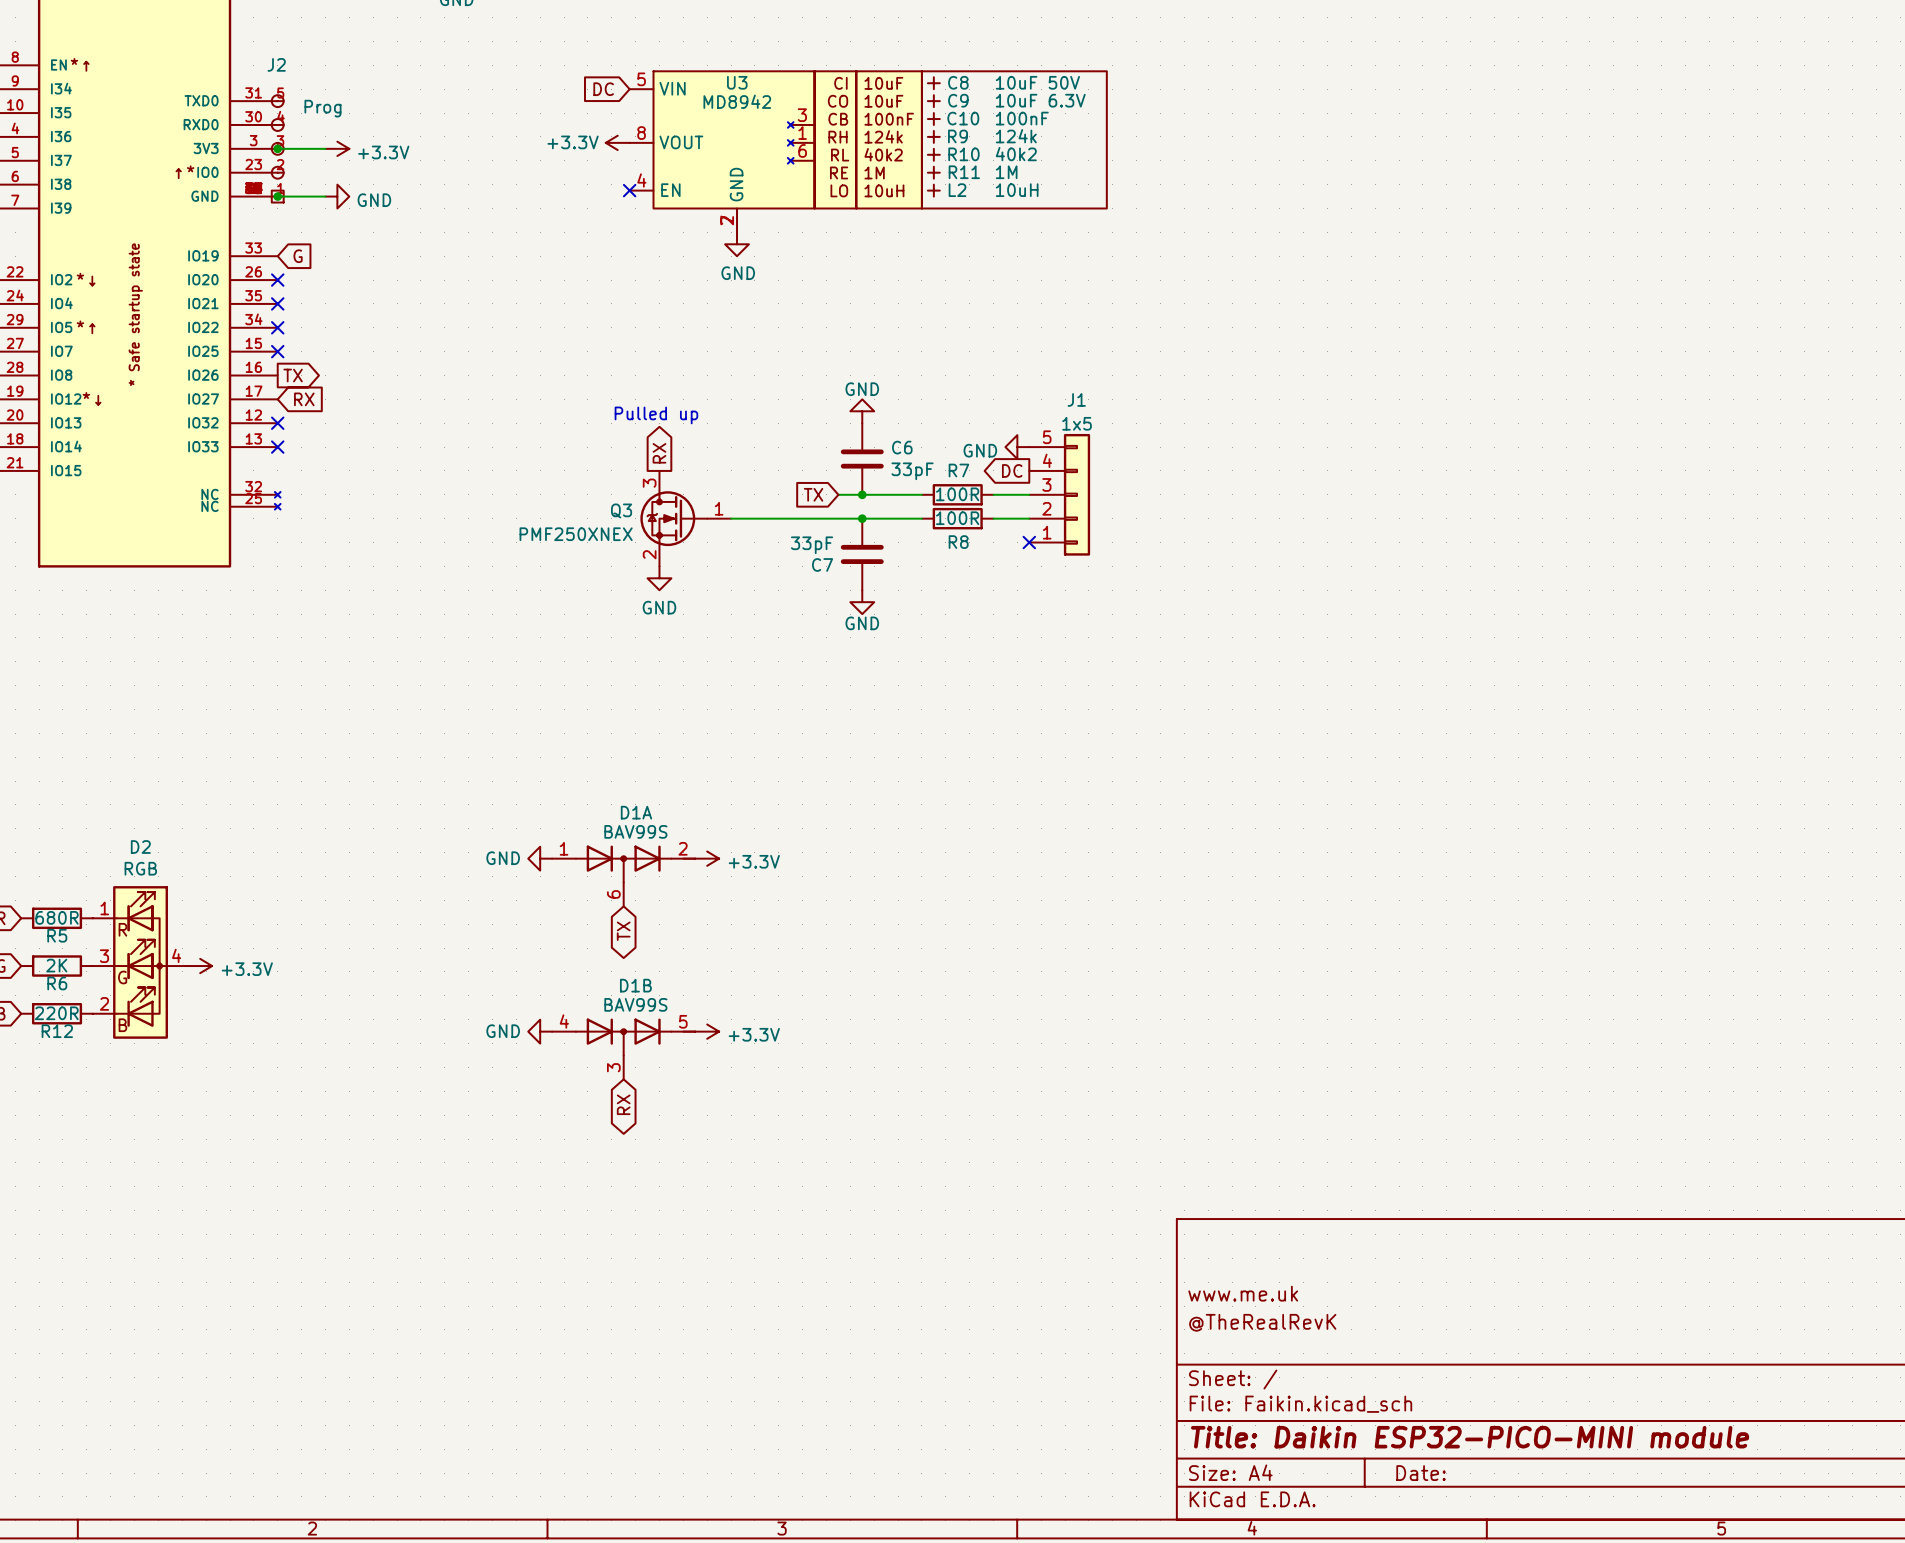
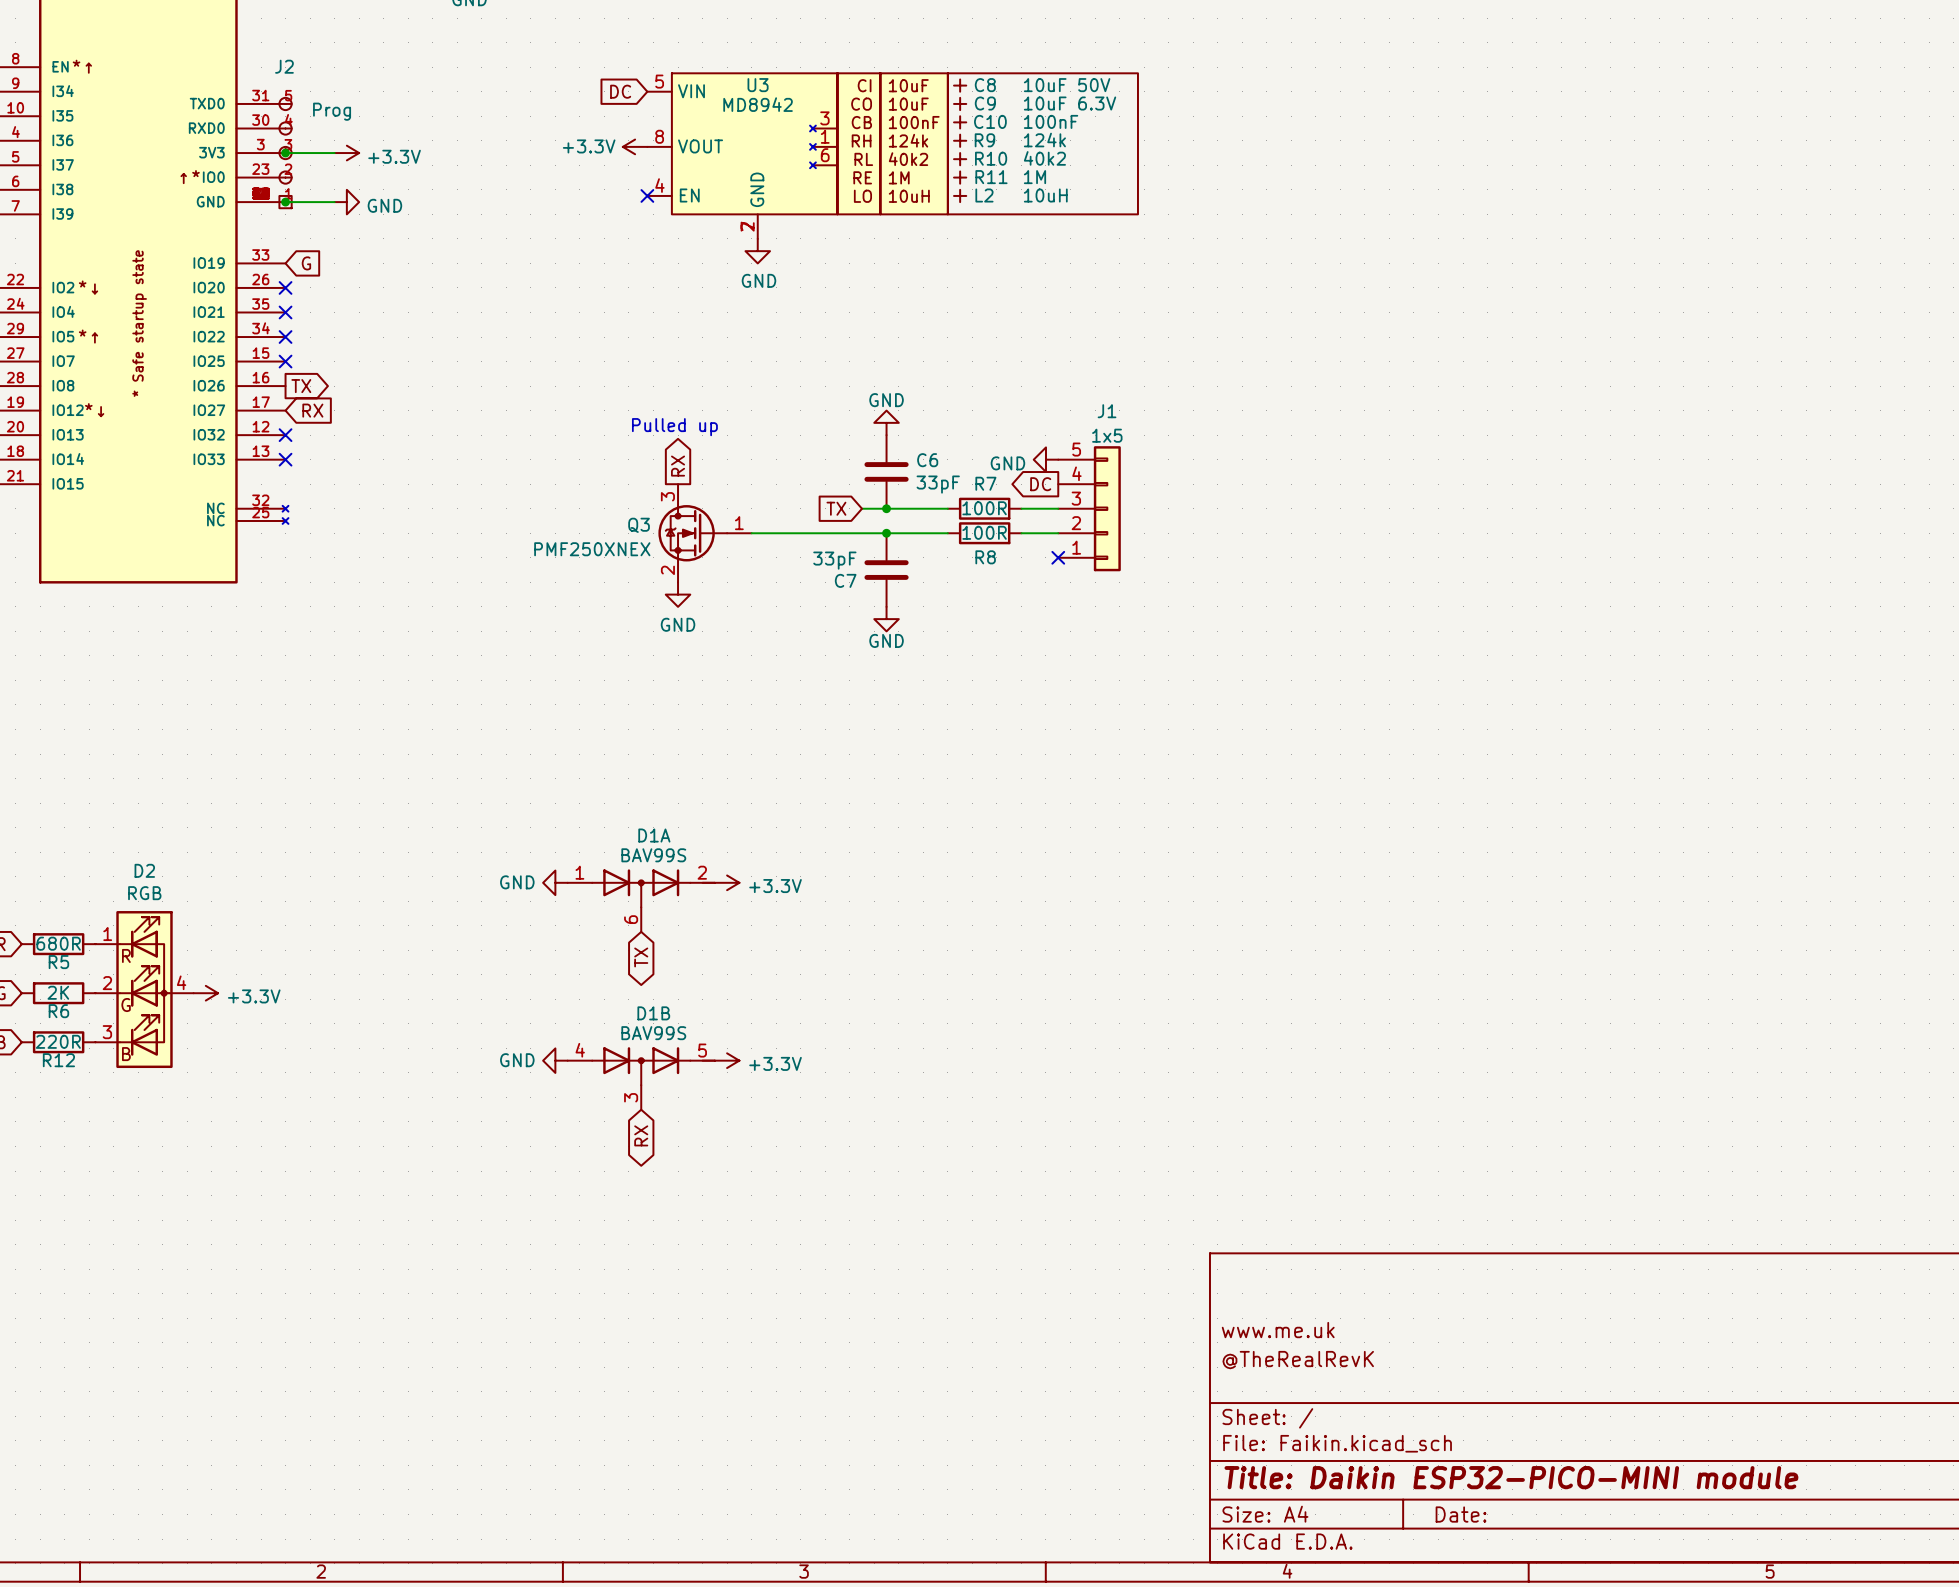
D2 pin number: 3 (104, 956) -> 2 (107, 983)
D2 pin number: 2 (104, 1003) -> 3 (107, 1032)

